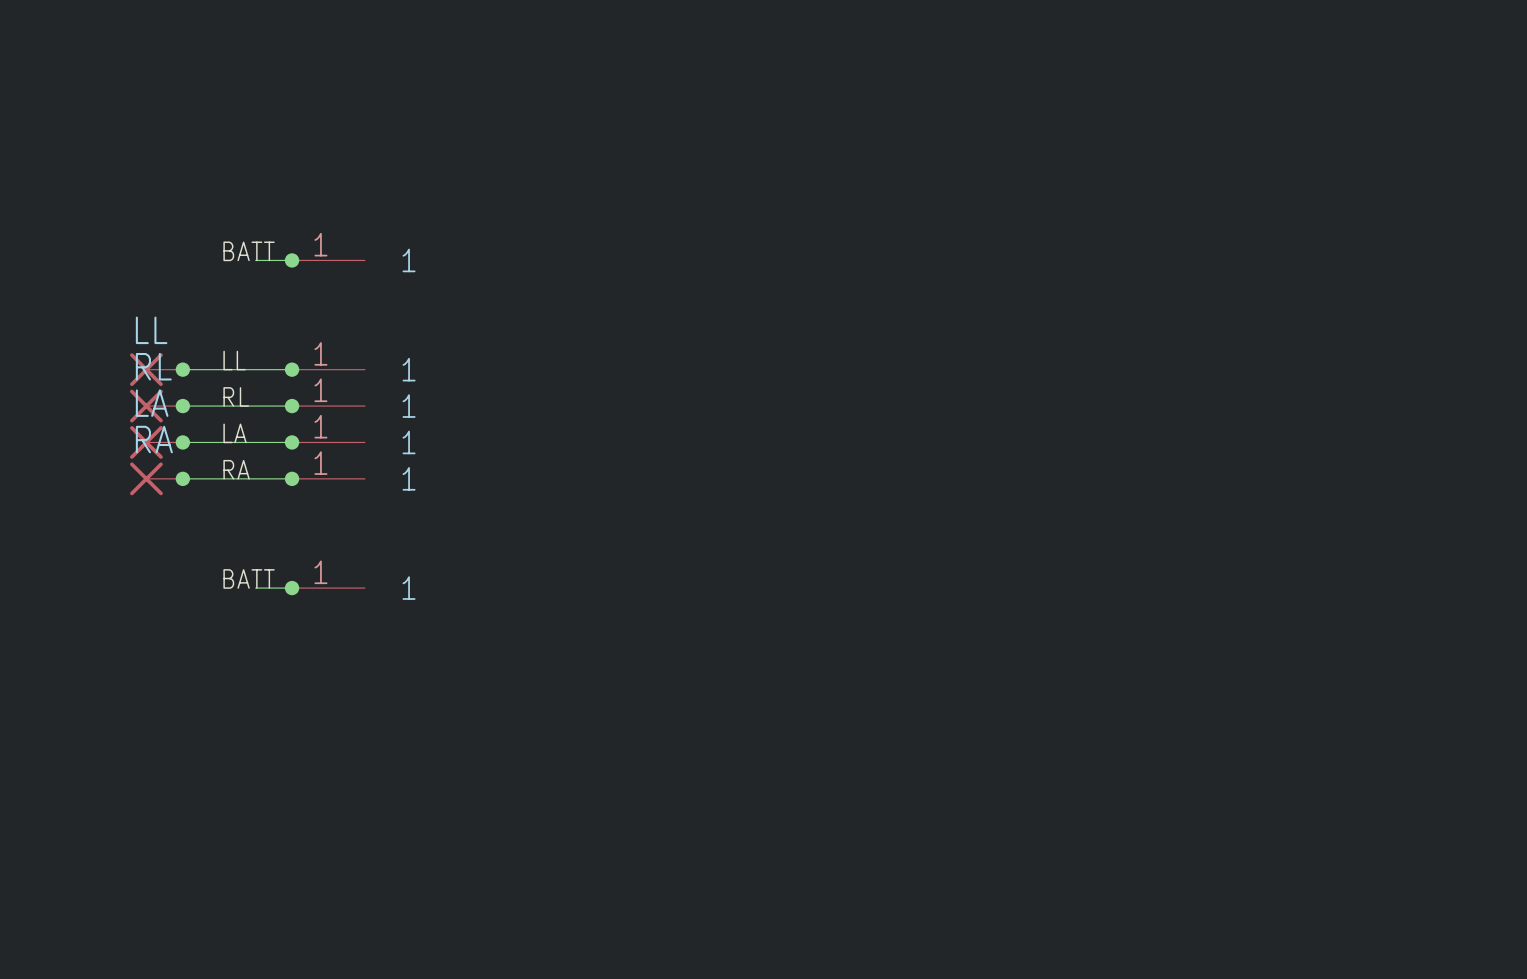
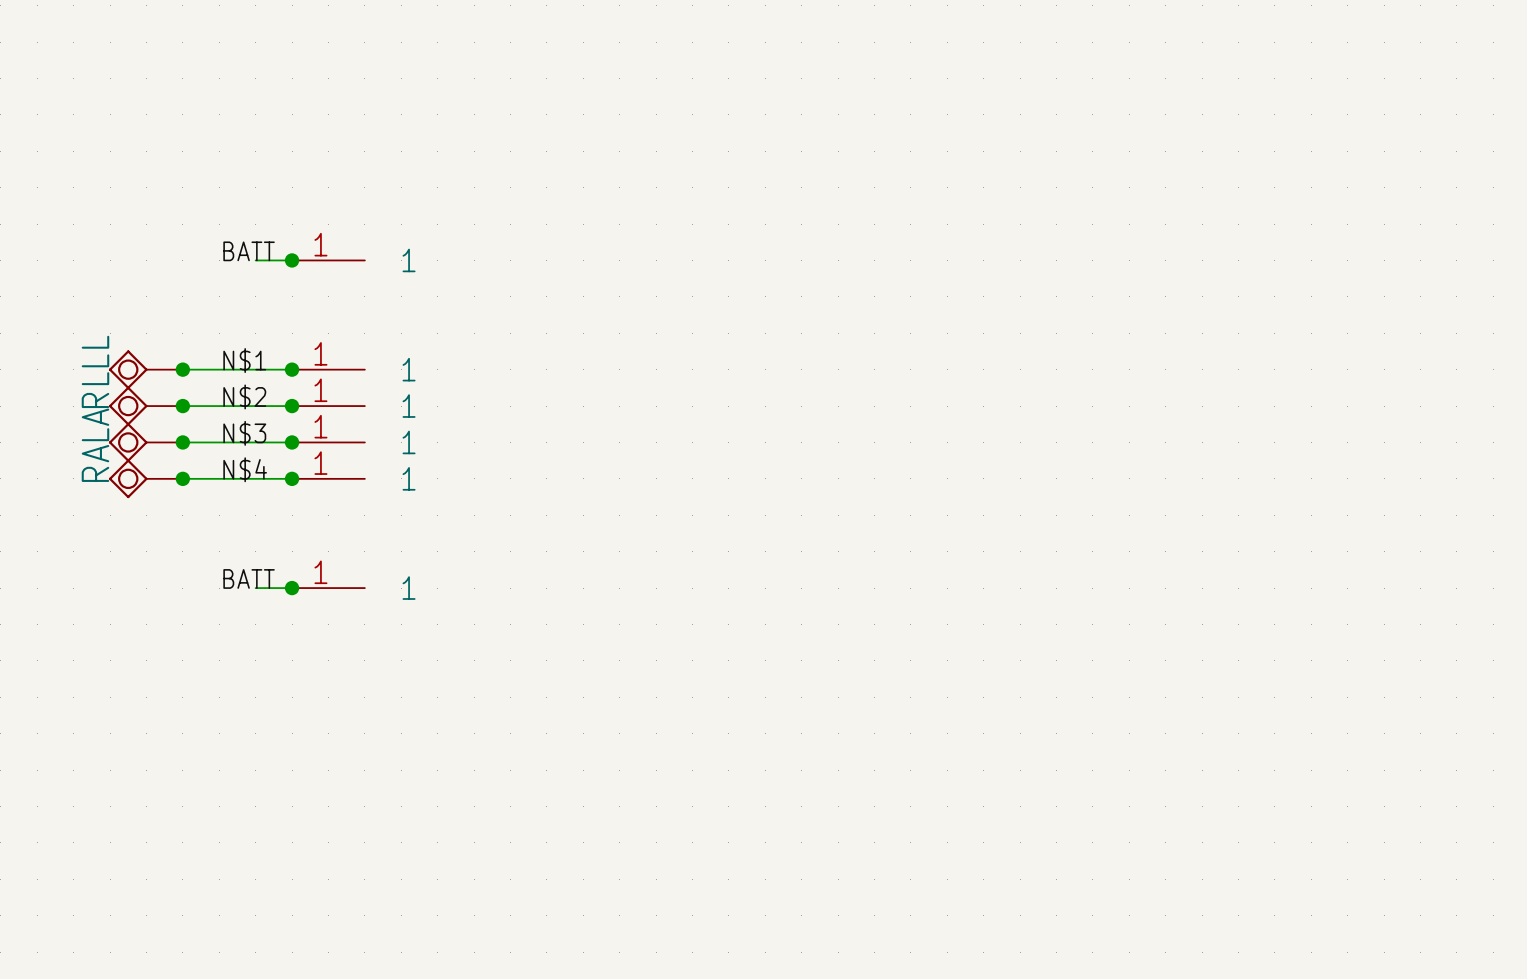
LL name position: LL (151, 330) -> LL (95, 351)
LL symbol: [130, 353, 183, 387] -> [108, 350, 183, 389]
label: LL (234, 360) -> N$1 (244, 360)
RL name position: RL (153, 366) -> RL (95, 390)
RL symbol: [130, 389, 183, 423] -> [108, 386, 183, 426]
label: RL (236, 396) -> N$2 (244, 396)
LA name position: LA (152, 403) -> LA (95, 424)
LA symbol: [130, 426, 183, 459] -> [108, 423, 183, 462]
label: LA (235, 433) -> N$3 (244, 433)
RA name position: RA (154, 439) -> RA (95, 463)
RA symbol: [130, 462, 183, 496] -> [108, 459, 183, 499]
label: RA (236, 469) -> N$4 (245, 469)

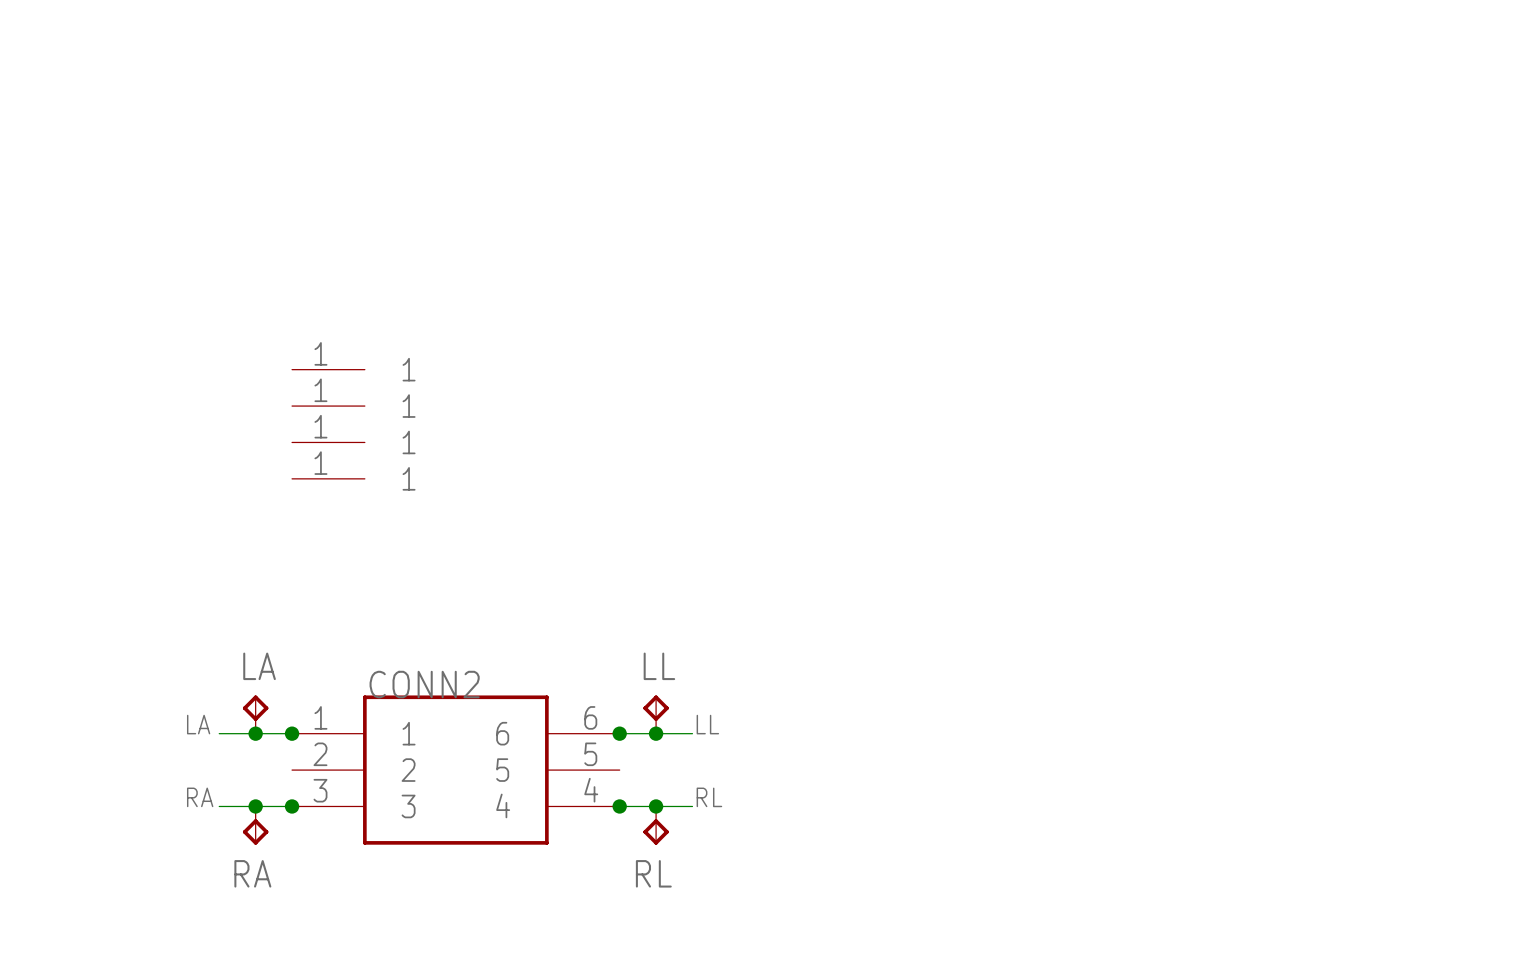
label: BATT (249, 251) -> none
wire: (255, 260) (292, 260) -> none
junction: (292, 260) -> none
part: (328, 260) -> none
label: N$1 (244, 360) -> none
LL: (145, 369) -> none
wire: (182, 369) (292, 369) -> none
junction: (182, 369) -> none
junction: (292, 369) -> none
label: N$2 (244, 396) -> none
RL: (145, 406) -> none
wire: (182, 406) (292, 406) -> none
junction: (182, 406) -> none
junction: (292, 406) -> none
label: N$3 (244, 433) -> none
LA: (145, 442) -> none
wire: (182, 442) (292, 442) -> none
junction: (182, 442) -> none
junction: (292, 442) -> none
label: N$4 (245, 469) -> none
RA: (145, 478) -> none
wire: (182, 478) (292, 478) -> none
junction: (182, 478) -> none
junction: (292, 478) -> none
label: BATT (249, 578) -> none
wire: (255, 588) (292, 588) -> none
junction: (292, 588) -> none
part: (328, 588) -> none
LA: none -> (255, 714)
LL: none -> (656, 714)
label: none -> LA (198, 724)
label: none -> LL (707, 724)
wire: none -> (219, 733) (292, 733)
junction: none -> (255, 733)
junction: none -> (292, 733)
wire: none -> (619, 733) (692, 733)
junction: none -> (619, 733)
junction: none -> (656, 733)
CONN2: none -> (455, 770)
label: none -> RA (200, 797)
label: none -> RL (709, 797)
wire: none -> (219, 806) (292, 806)
junction: none -> (255, 806)
junction: none -> (292, 806)
wire: none -> (619, 806) (692, 806)
junction: none -> (619, 806)
junction: none -> (656, 806)
RA: none -> (255, 825)
RL: none -> (656, 825)

